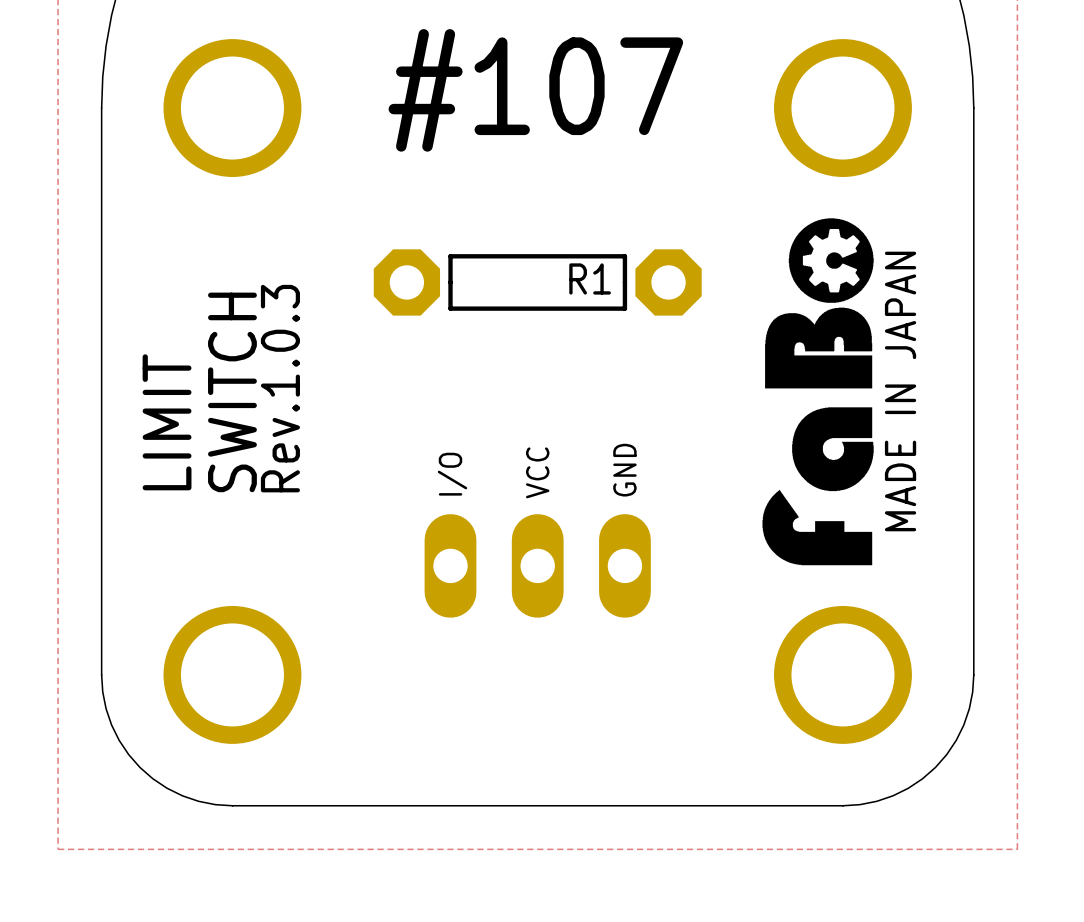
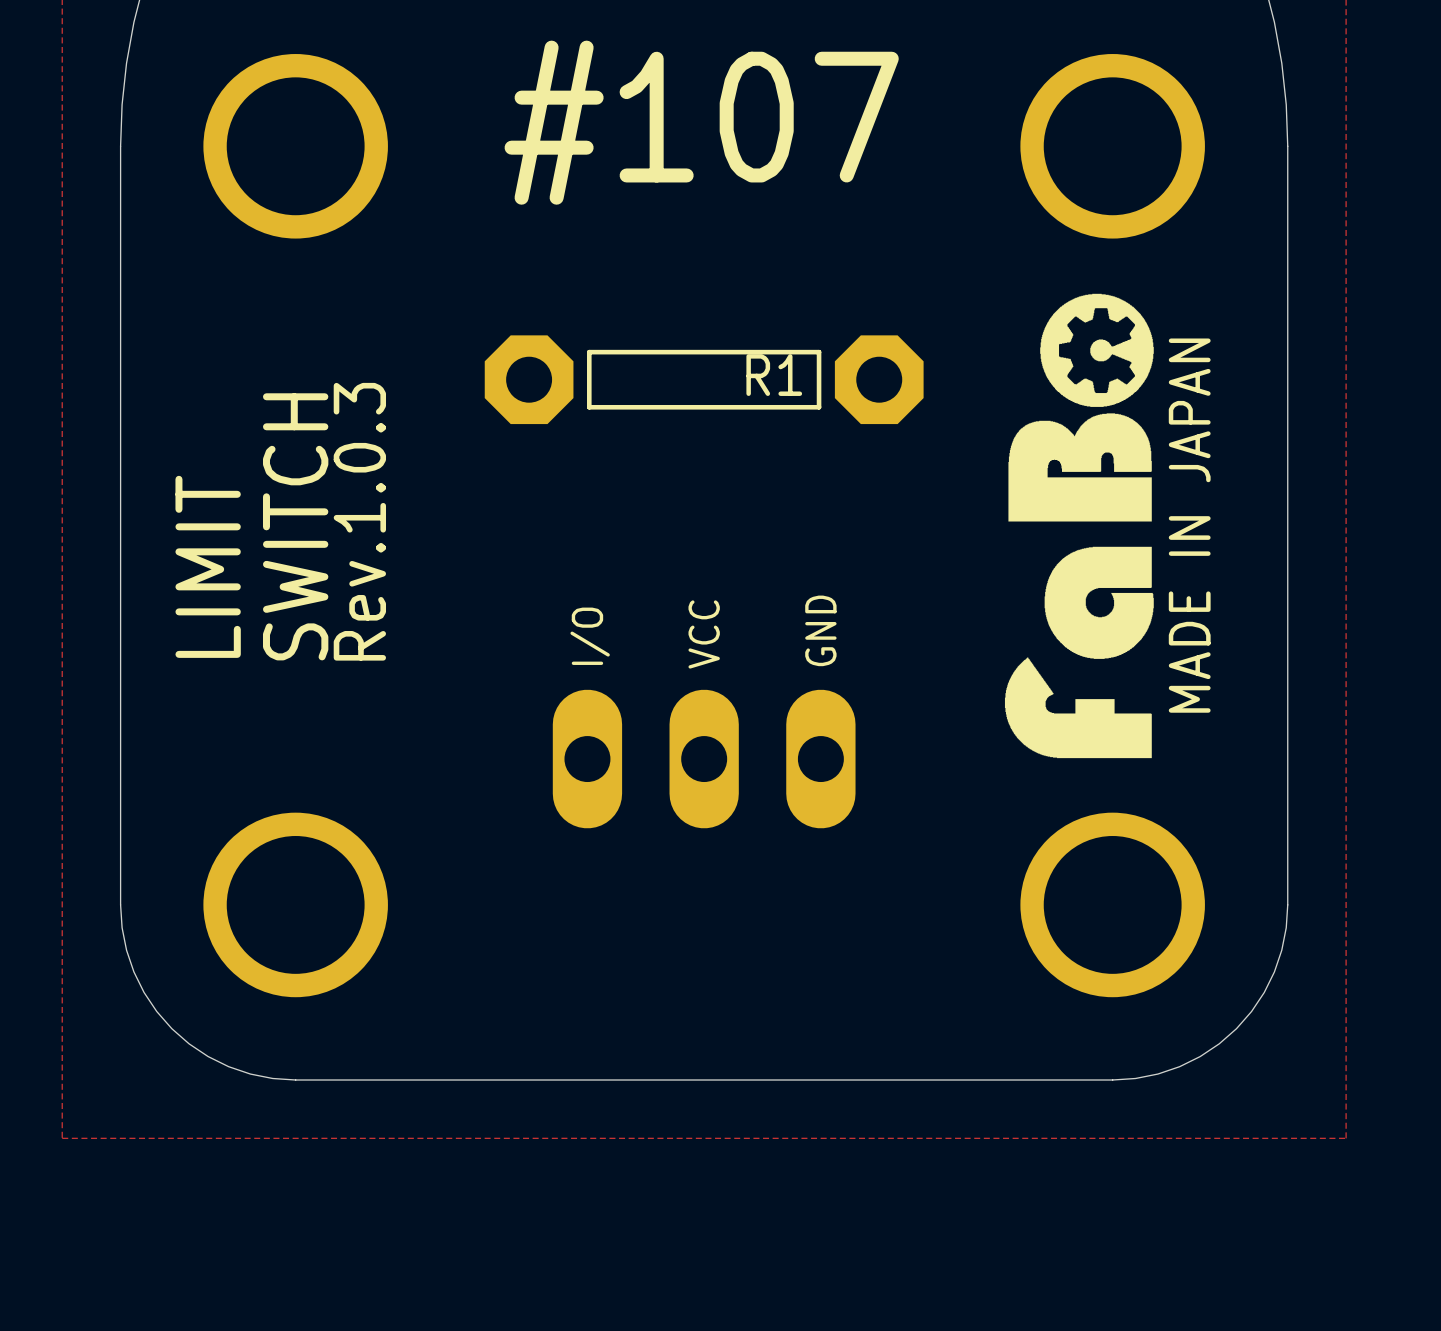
R1 footprint: [373, 249, 702, 316] -> [484, 335, 924, 425]

